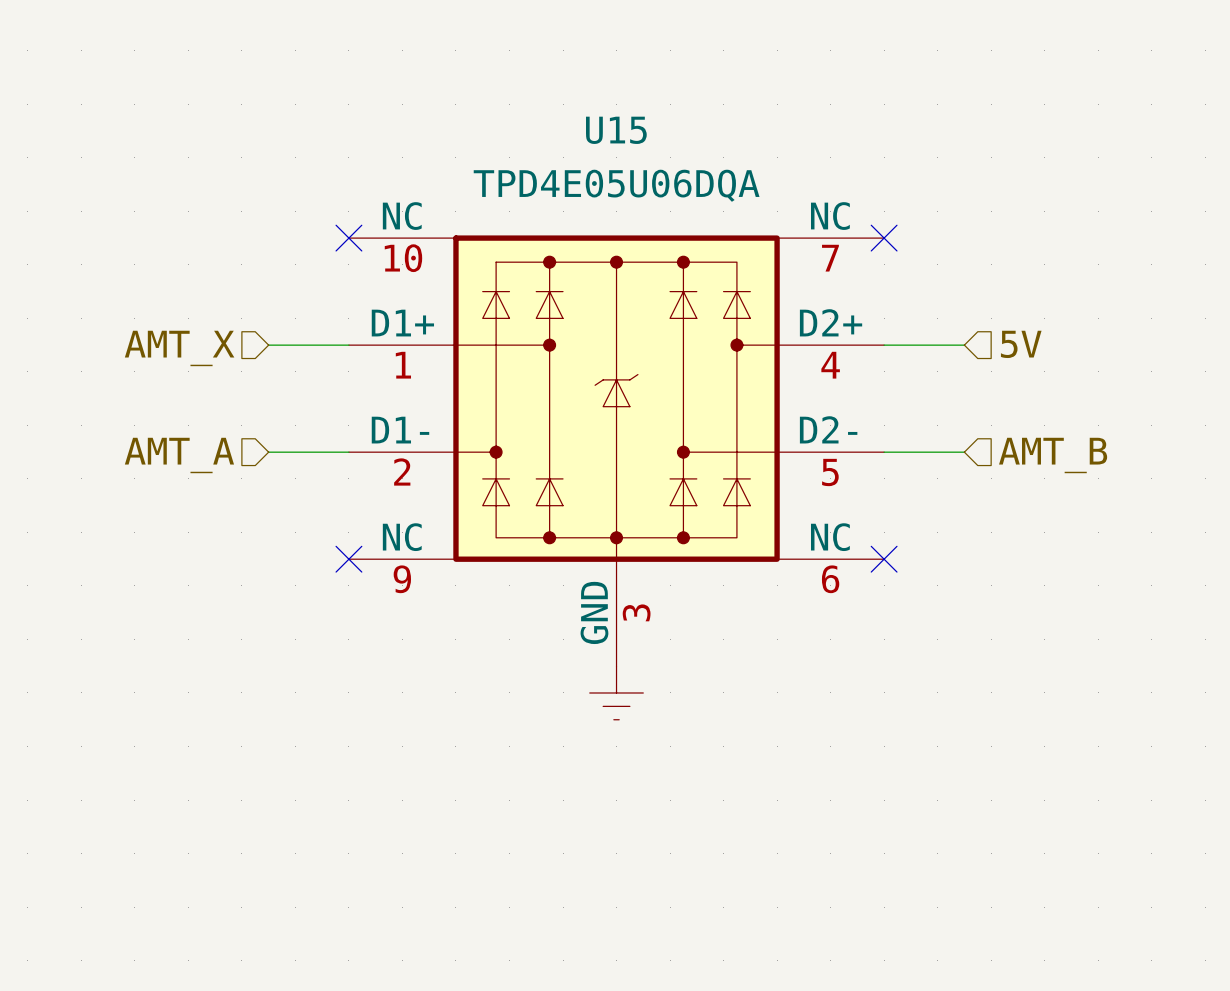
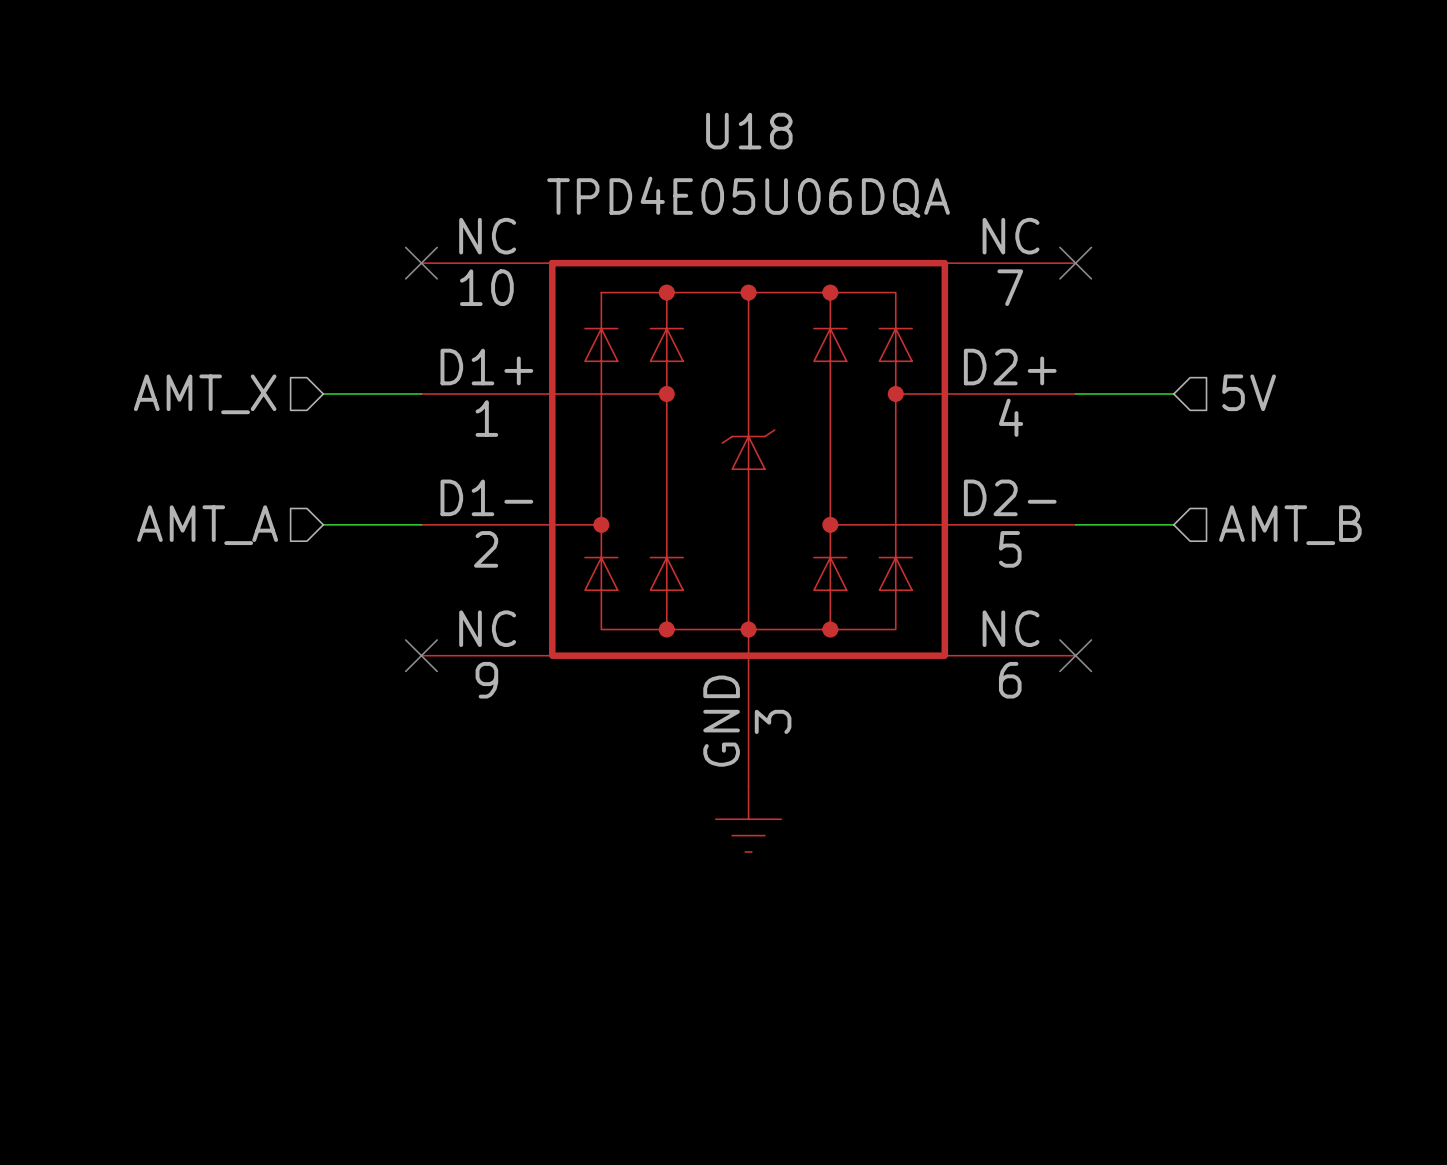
U15 name: U15 (616, 130) -> U18 (749, 131)

